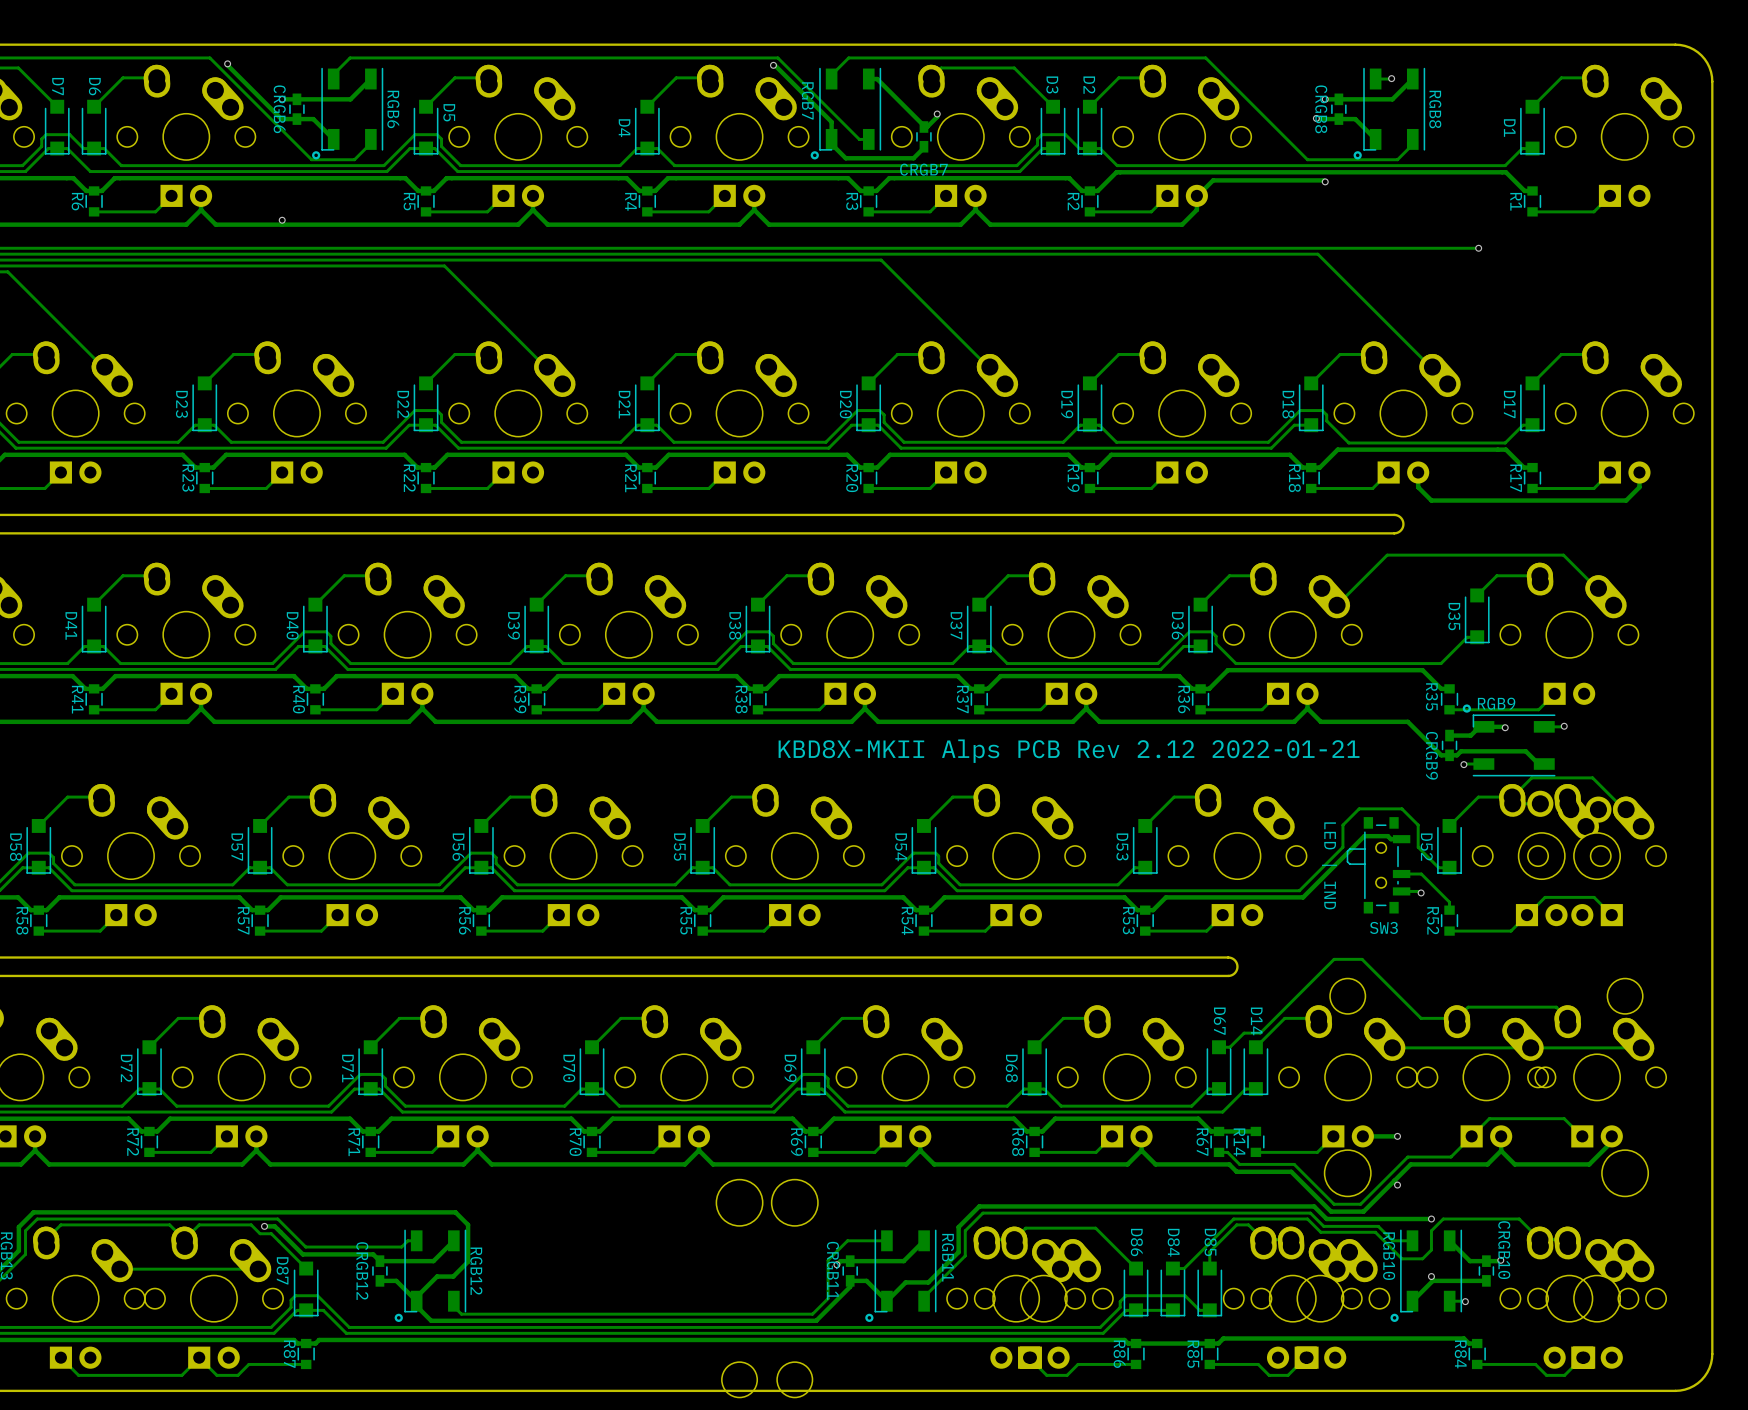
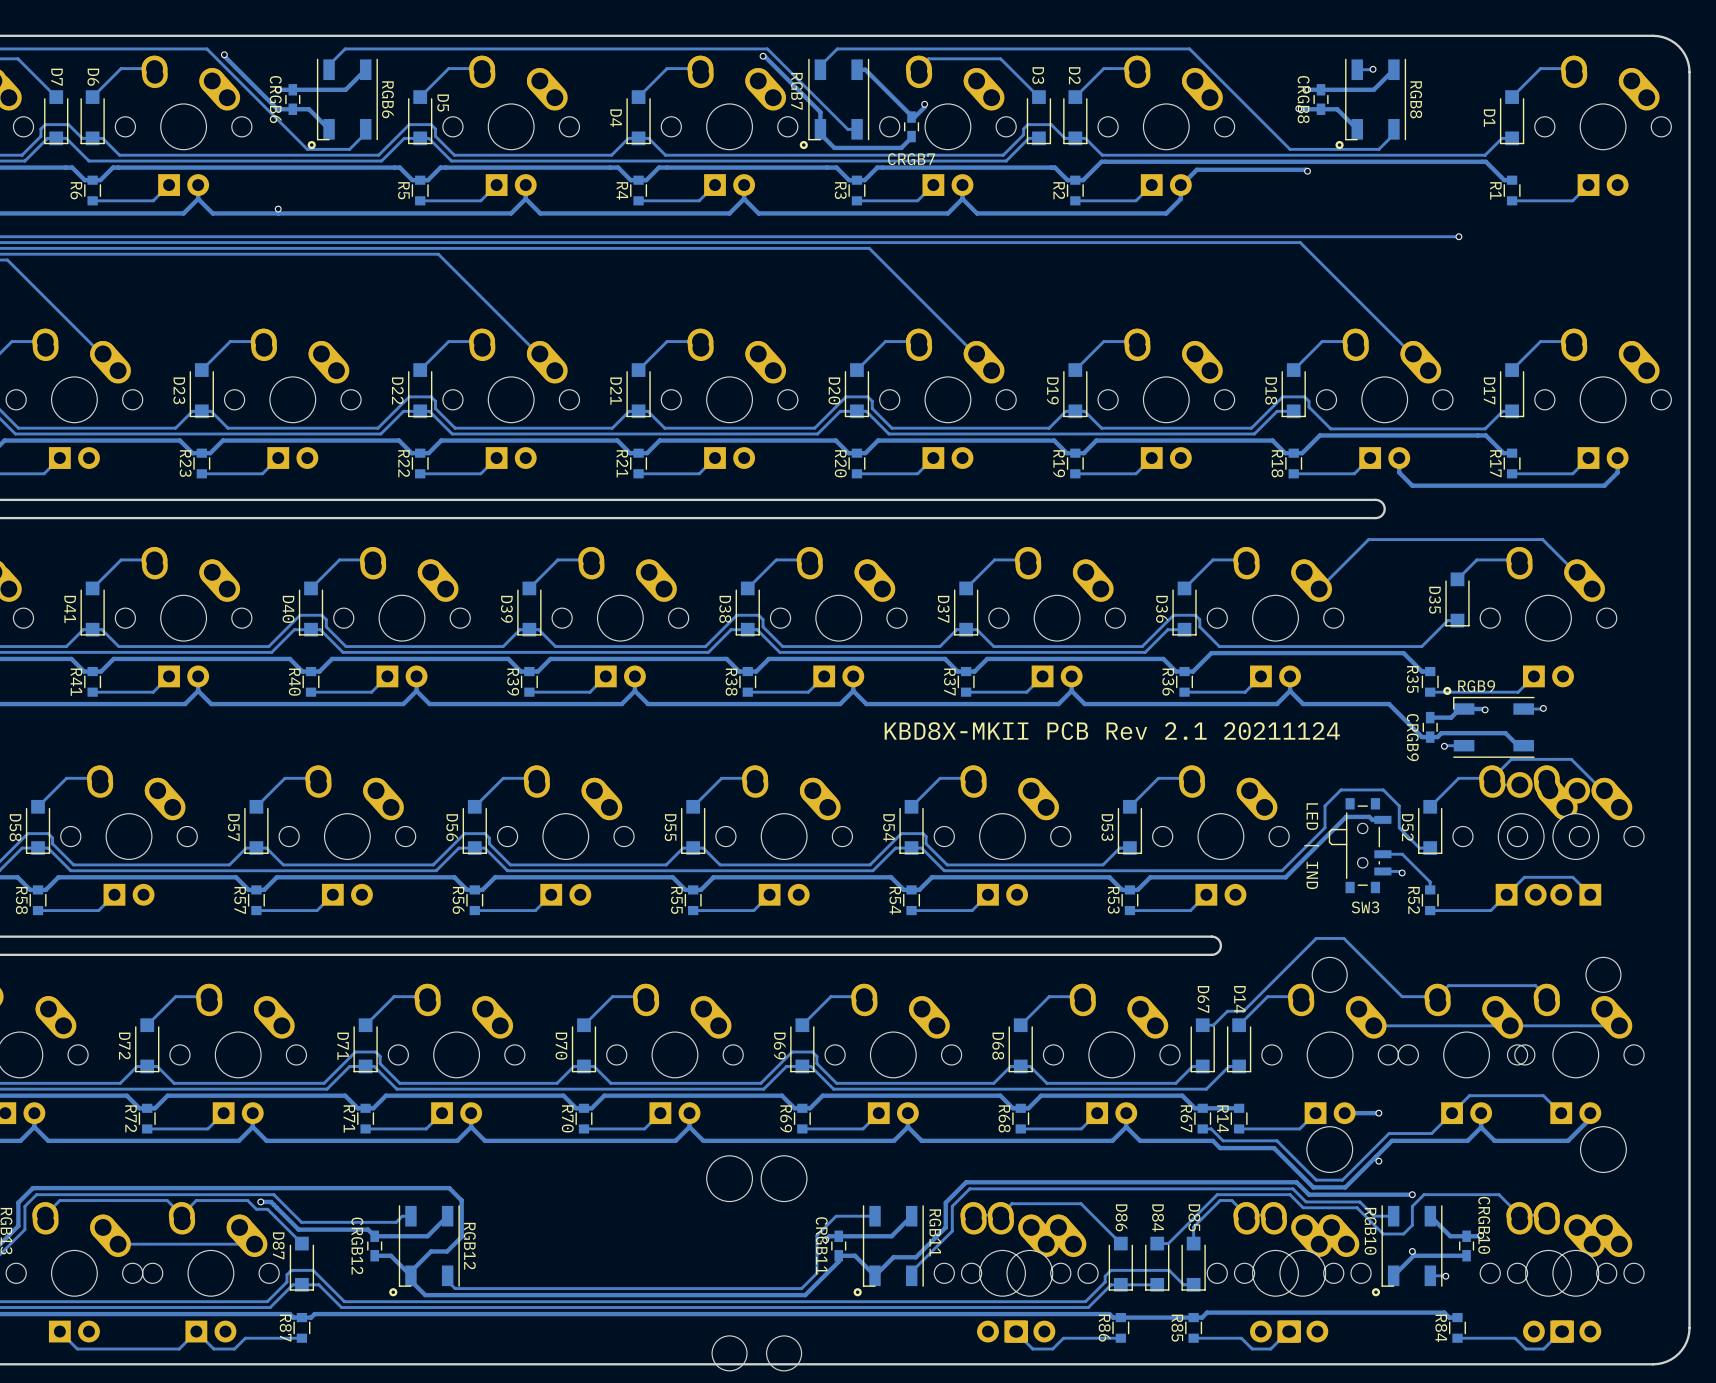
text: KBD8X-MKII Alps PCB Rev 2.12 2022-01-21 (1069, 751) -> KBD8X-MKII PCB Rev 2.1 20211124 (1112, 731)

